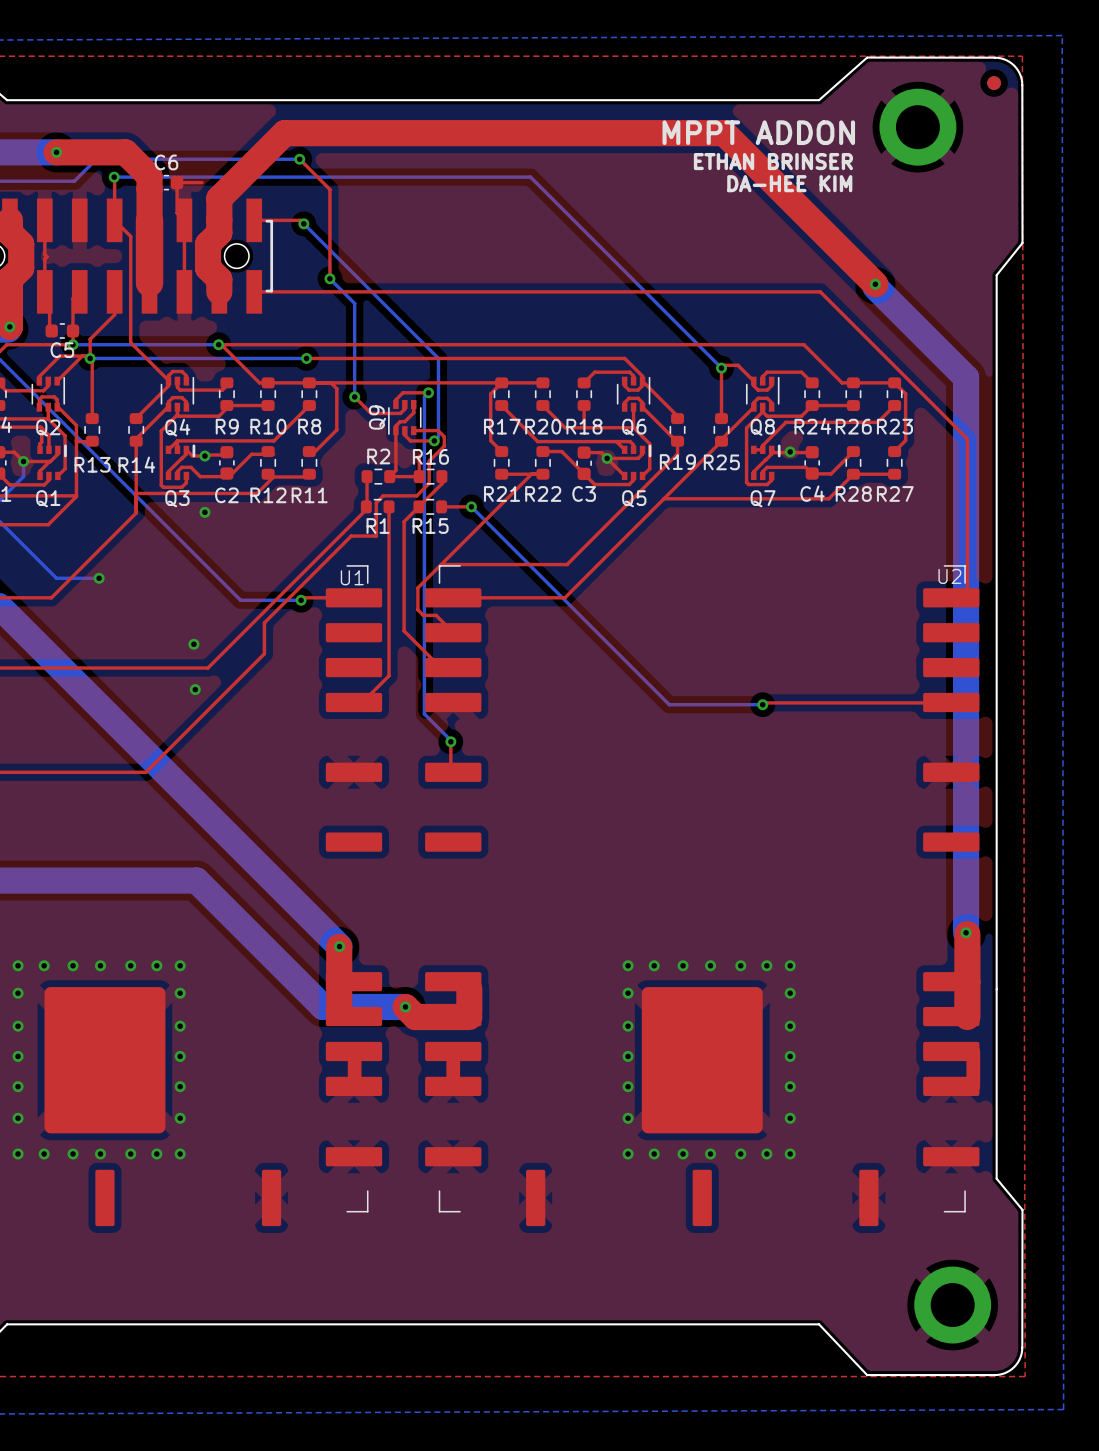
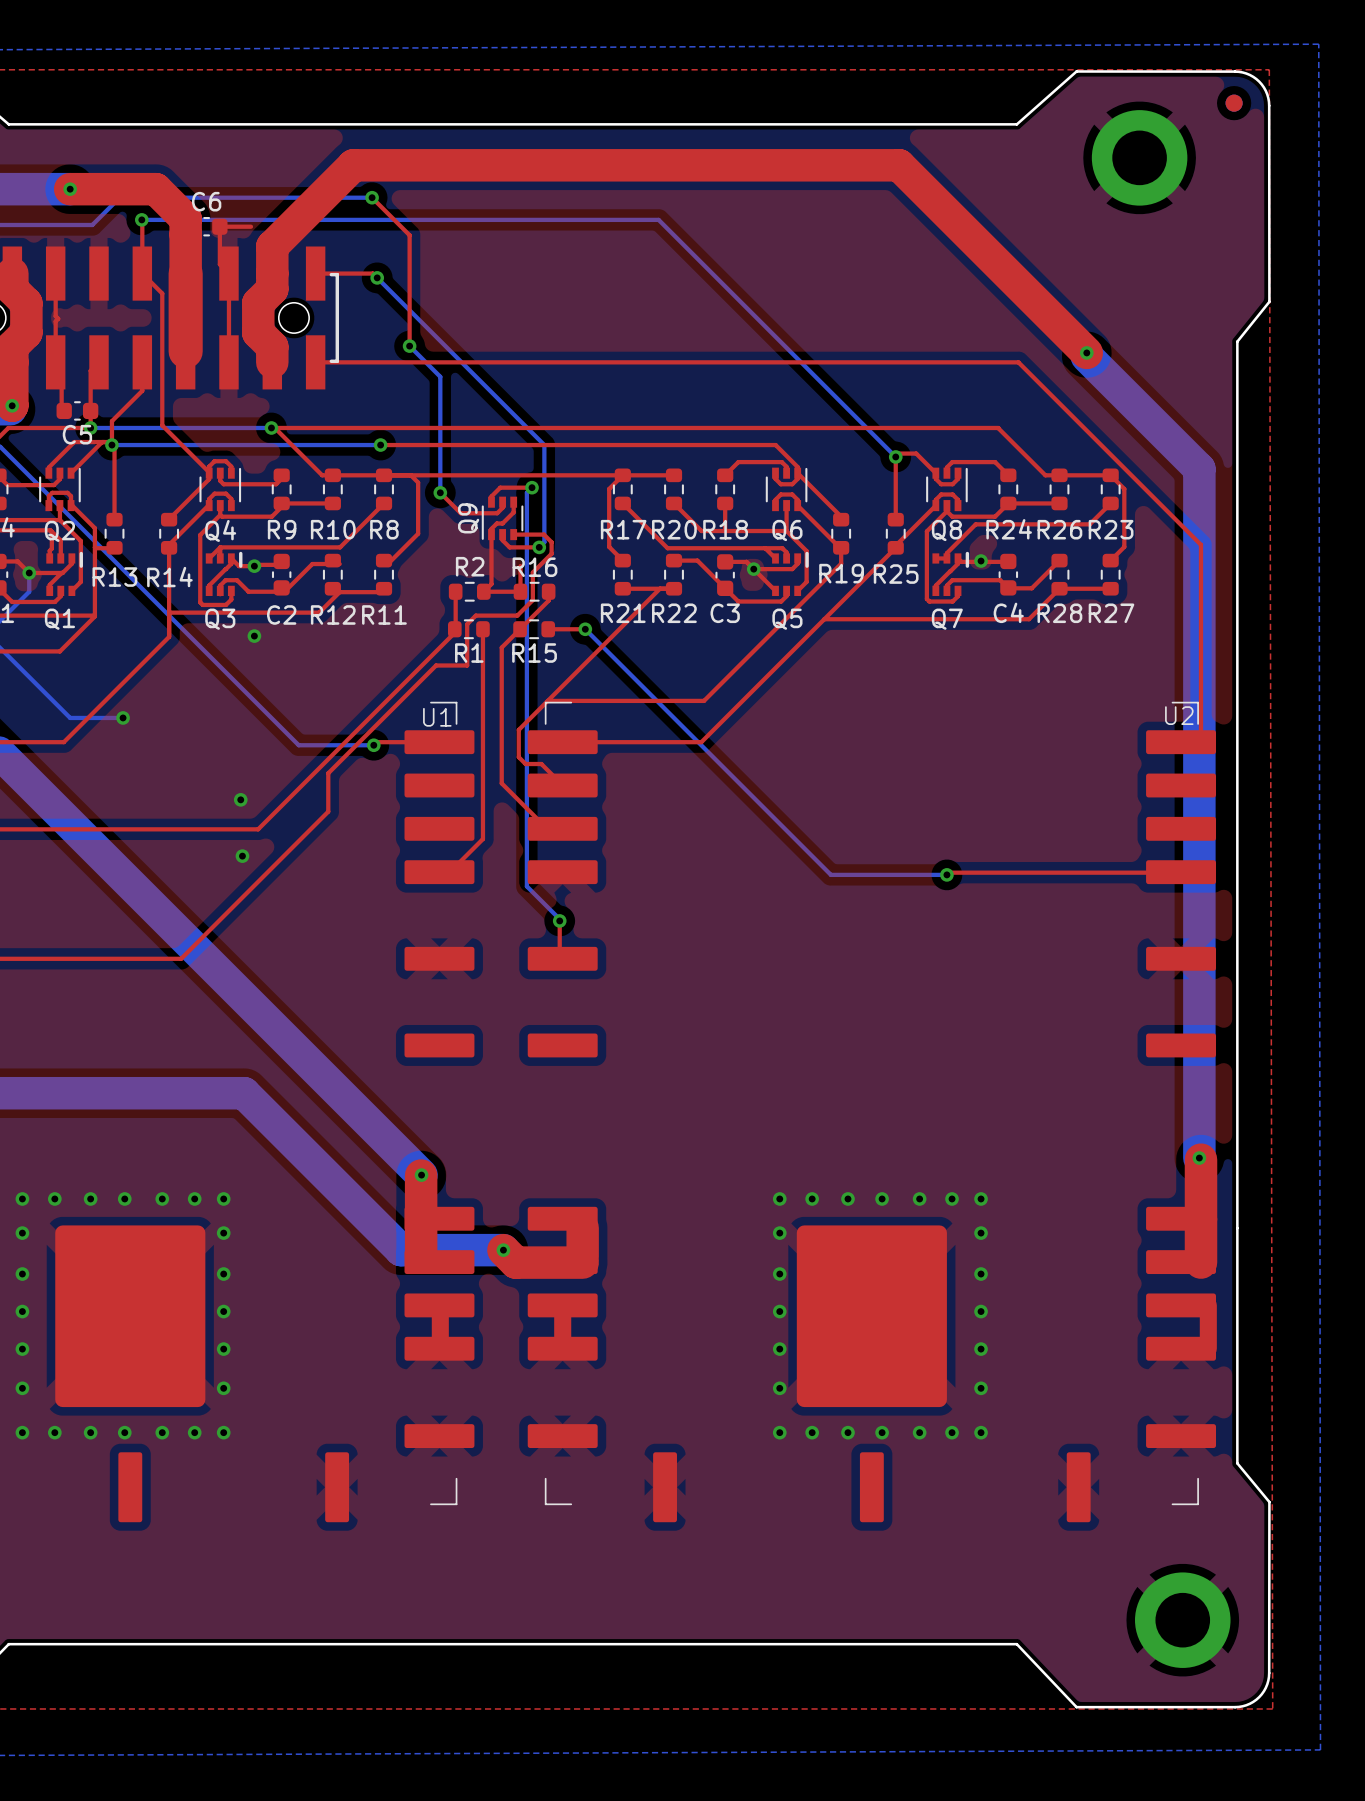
text: MPPT ADDON (758, 132) -> none
text: ETHAN BRINSER (773, 161) -> none
text: DA-HEE KIM (789, 183) -> none

